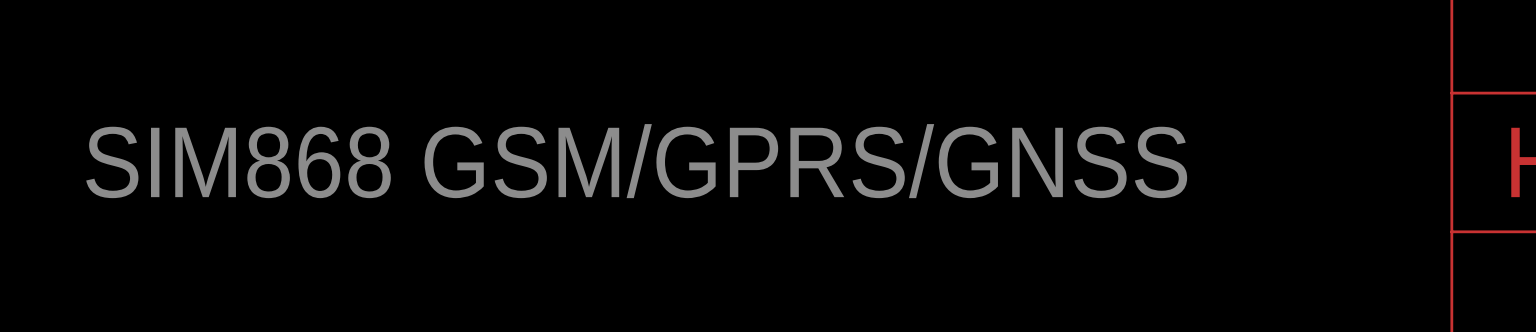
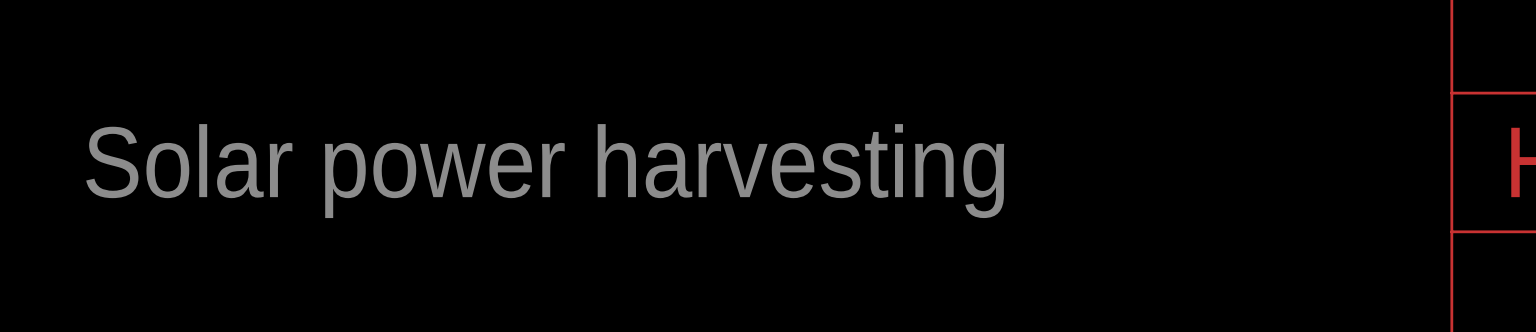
text: SIM868 GSM/GPRS/GNSS (636, 161) -> Solar power harvesting (545, 171)

